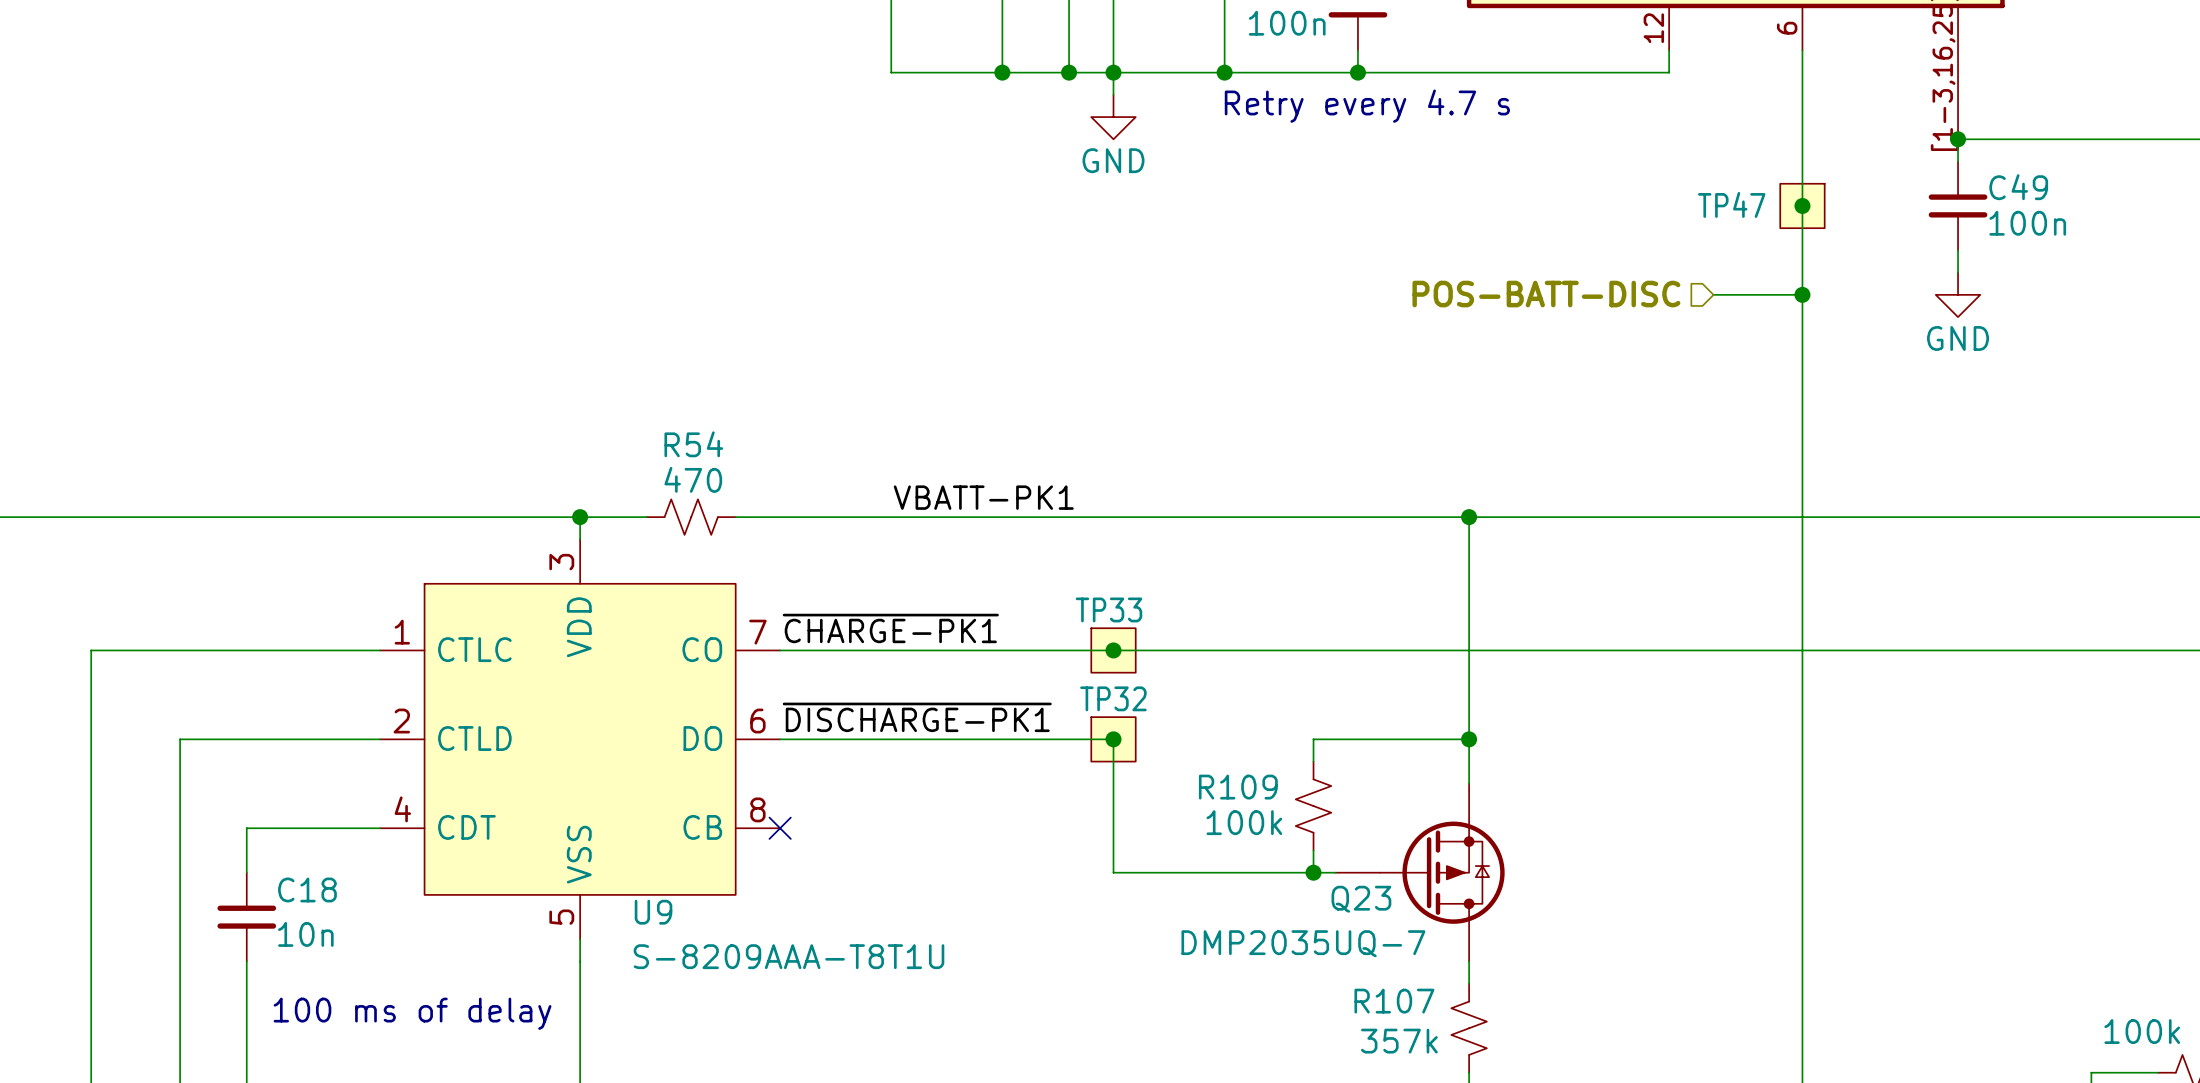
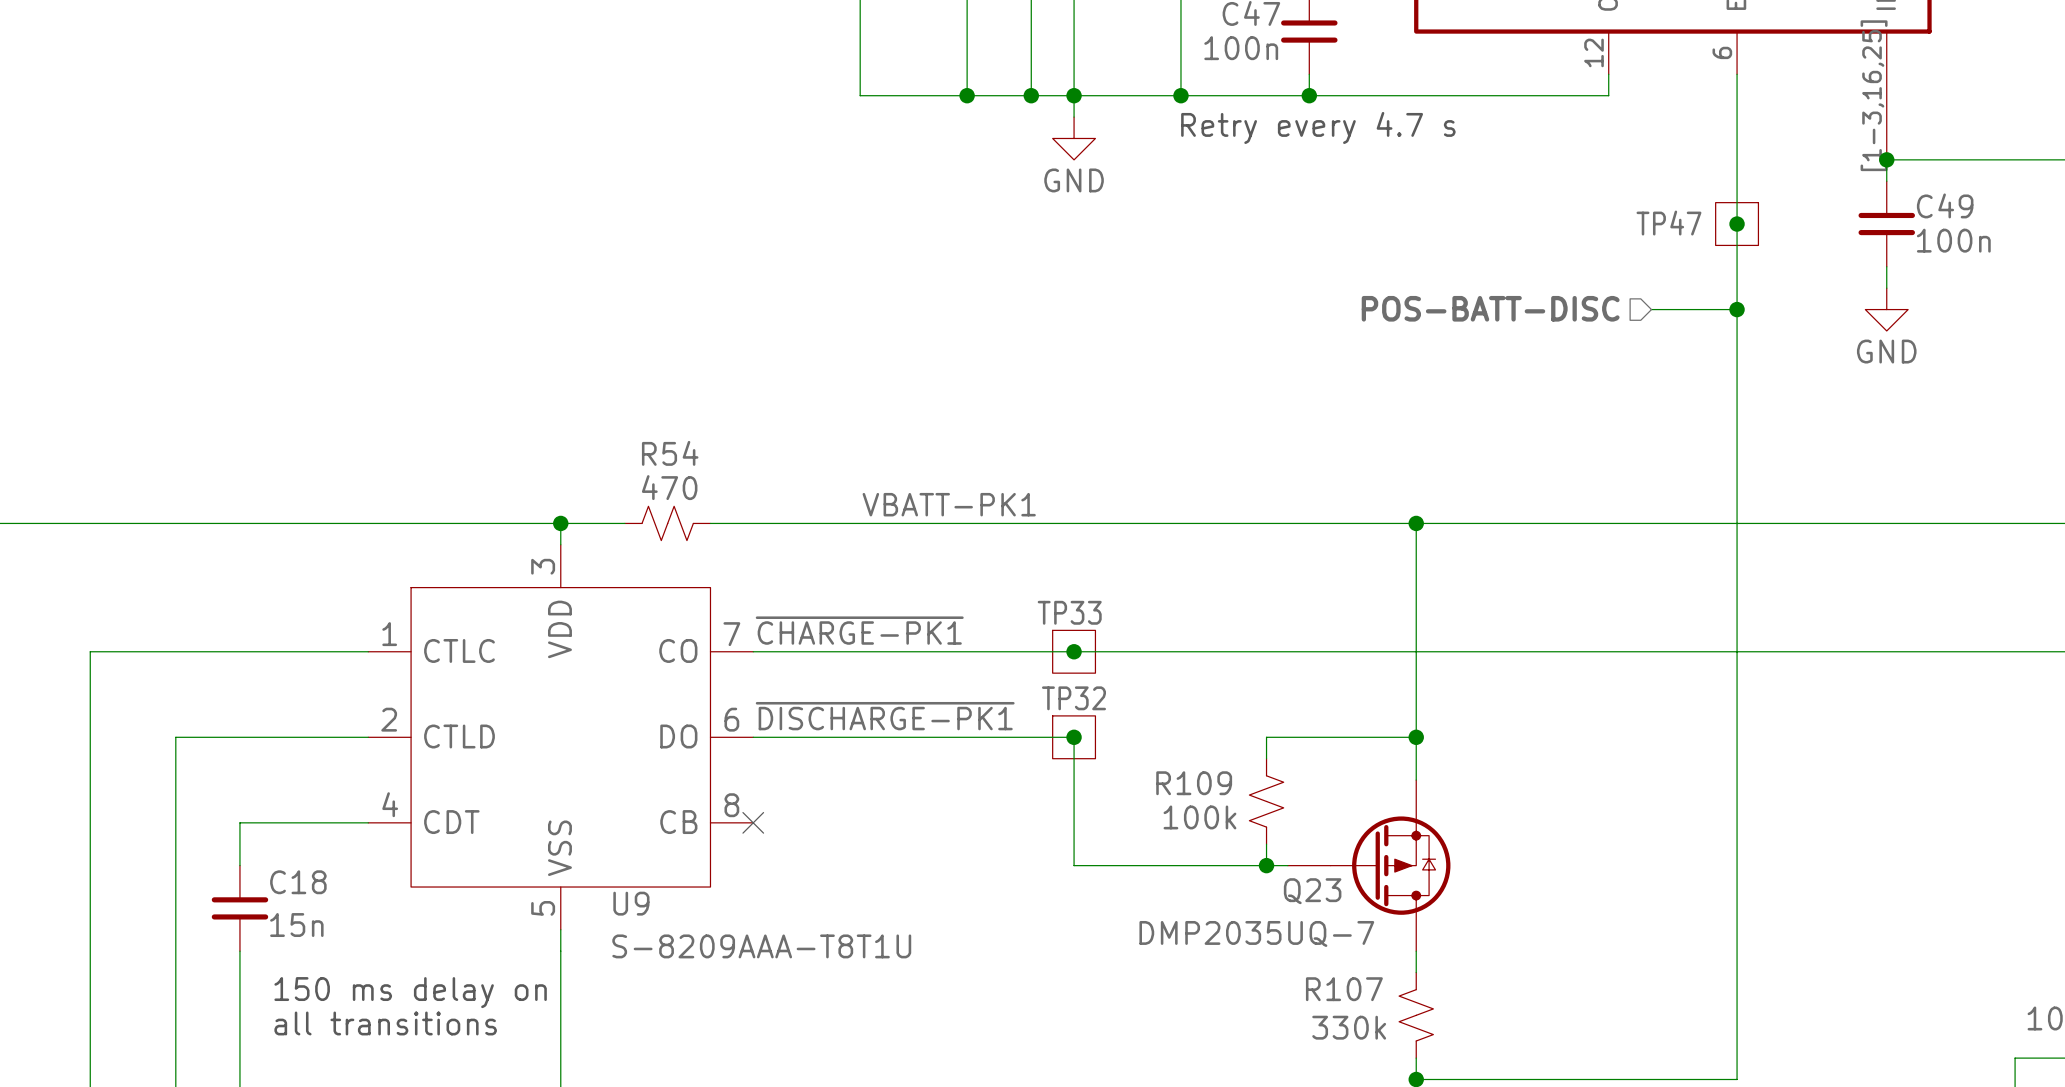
C18 value: 10n (305, 934) -> 15n (296, 925)
text: 100 ms of delay (412, 1013) -> 150 ms delay on (410, 992)
text: none -> all transitions (385, 1023)
R107 value: 357k (1399, 1041) -> 330k (1349, 1027)

